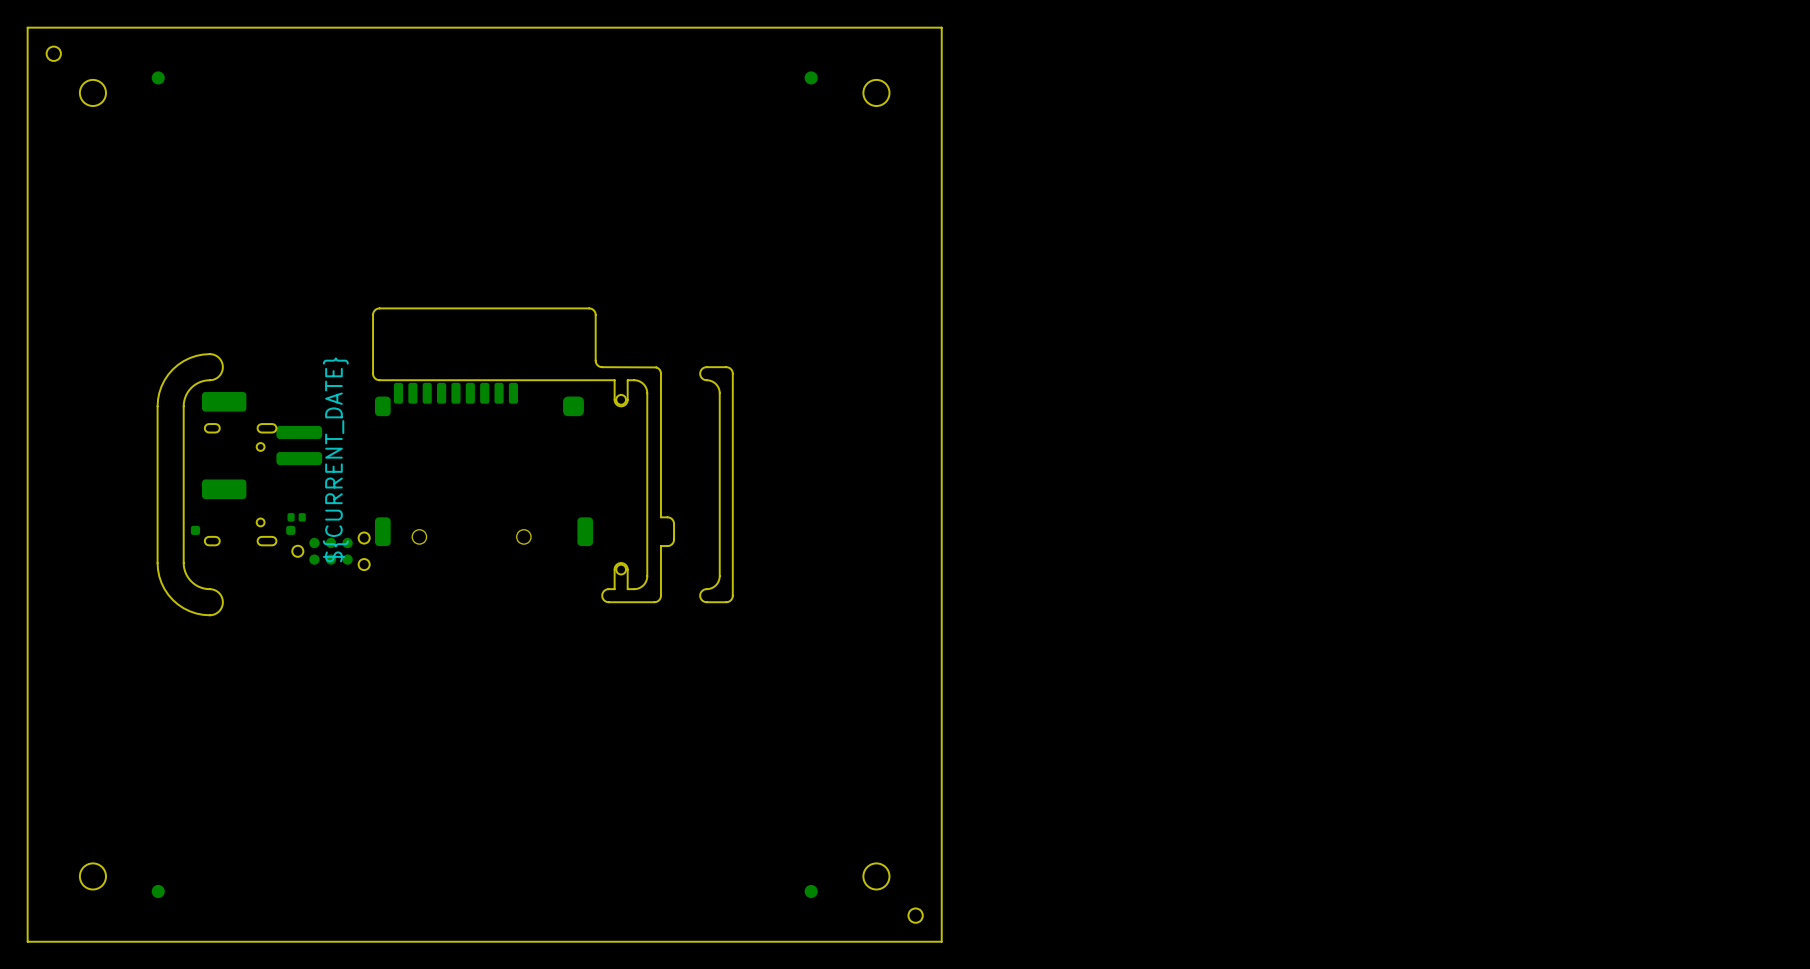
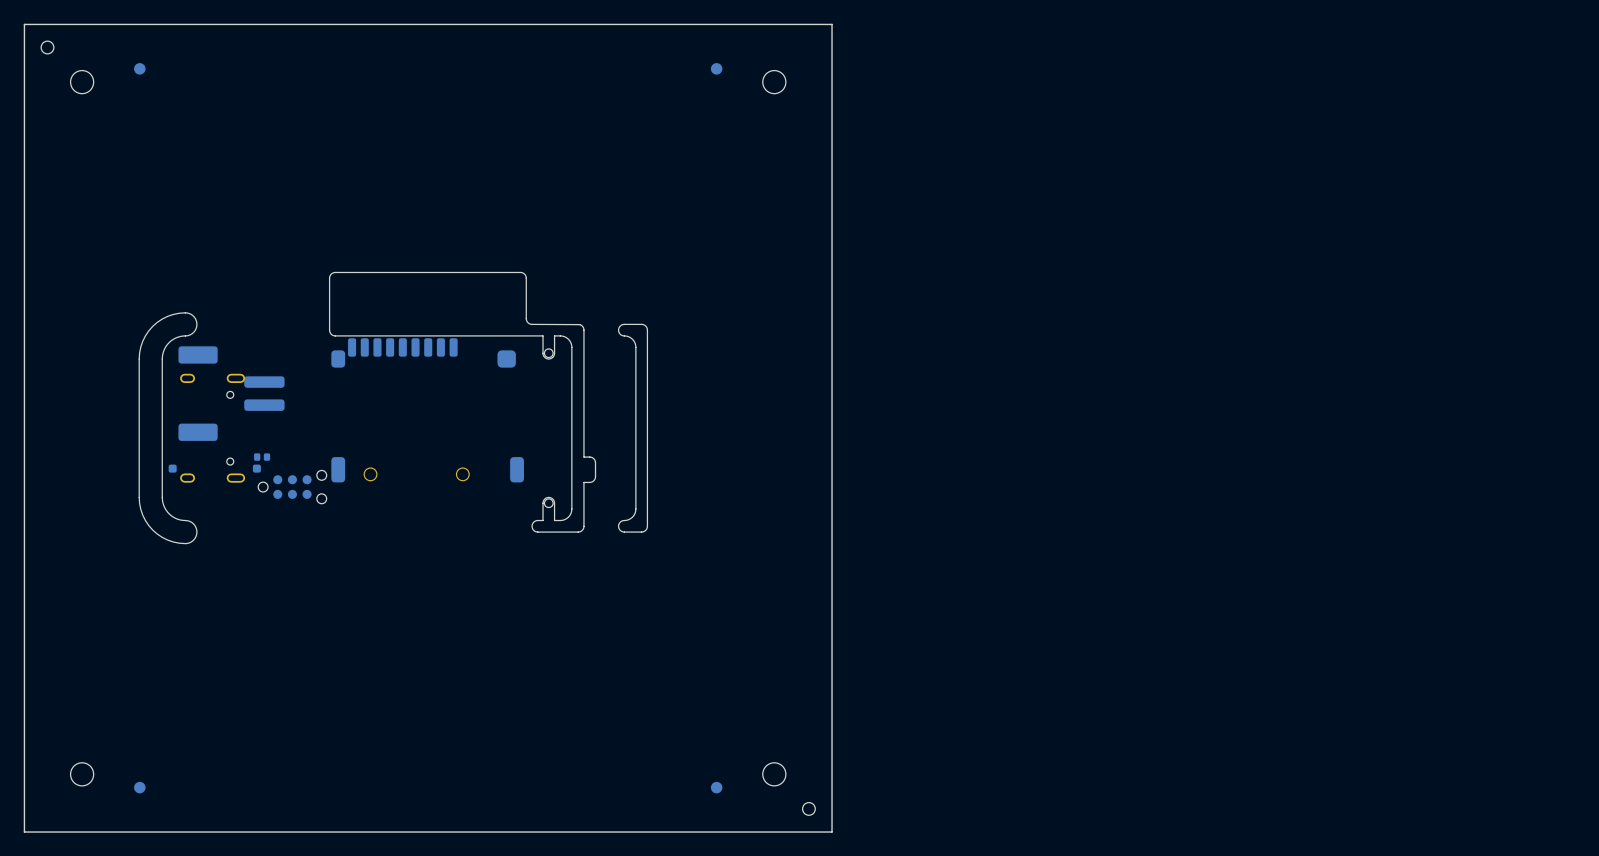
text: ${CURRENT_DATE} (335, 459) -> none

